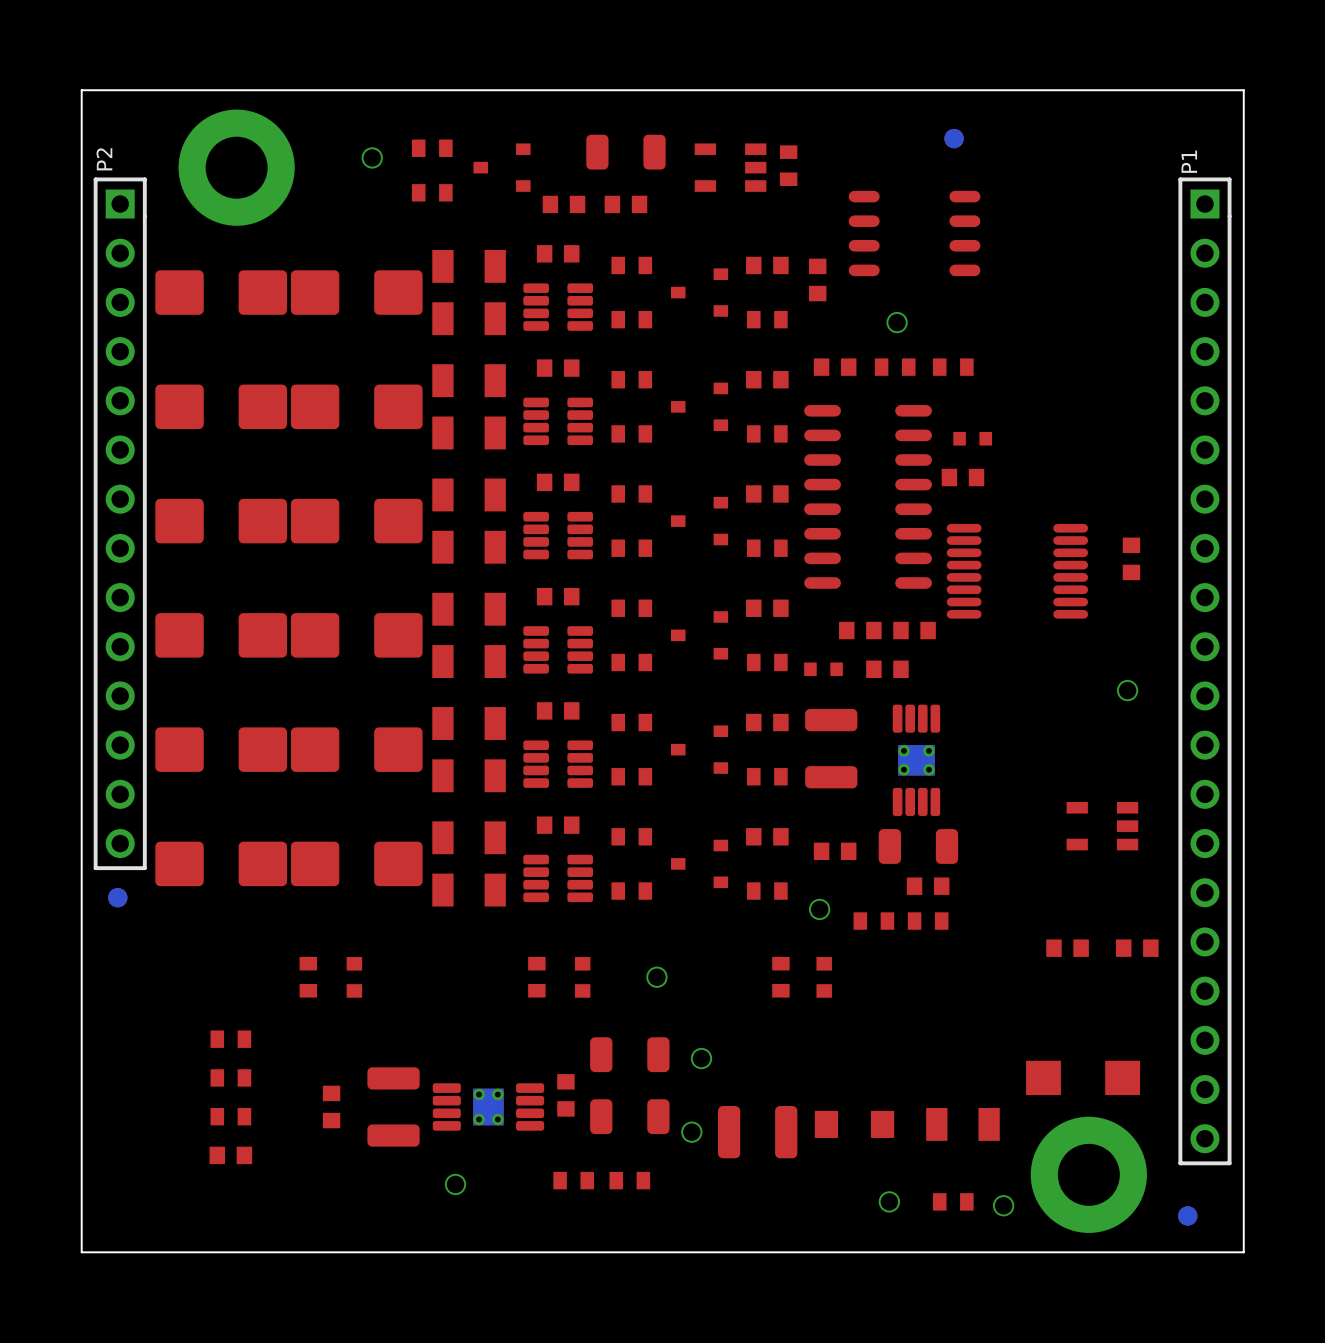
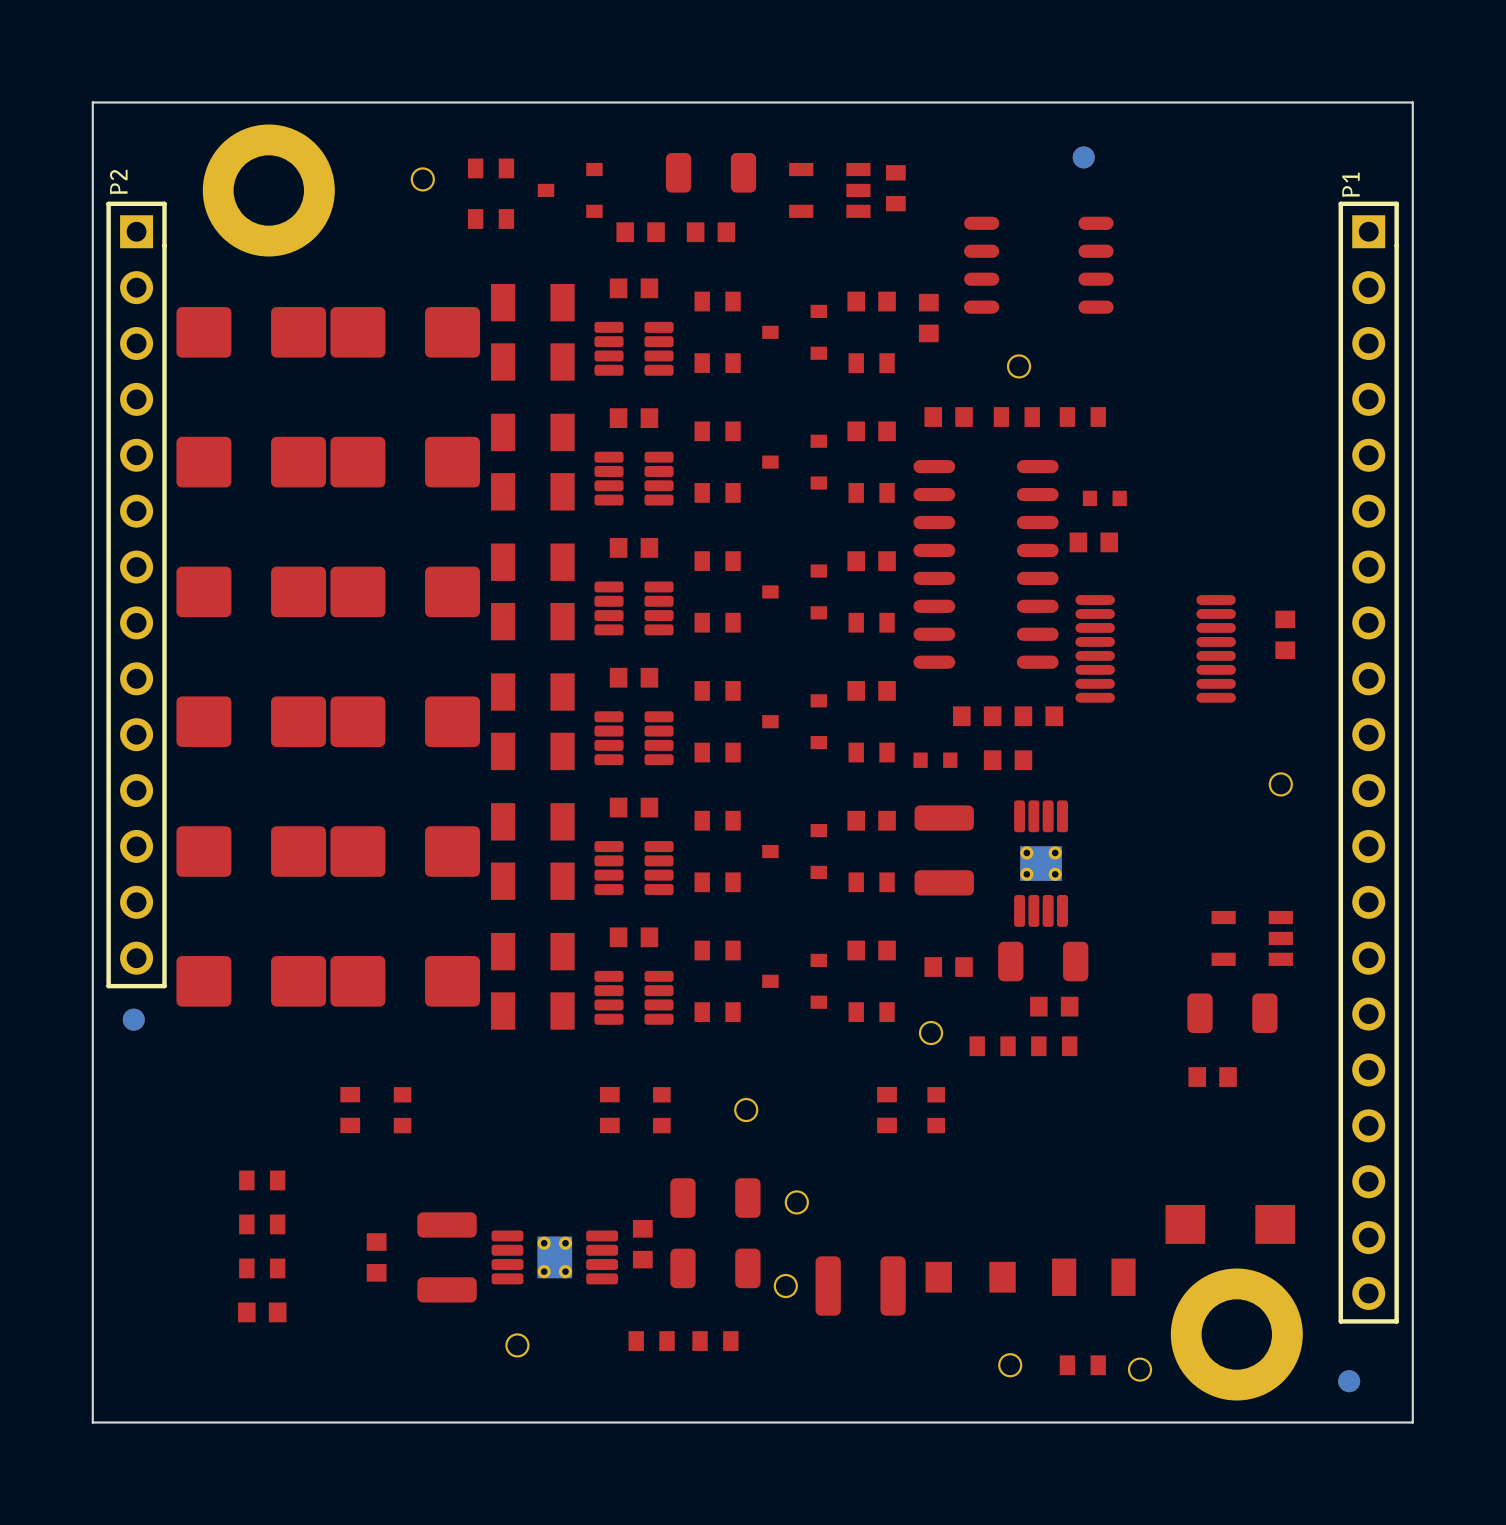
part: none -> (1232, 1013)
part: (1137, 948) -> none

